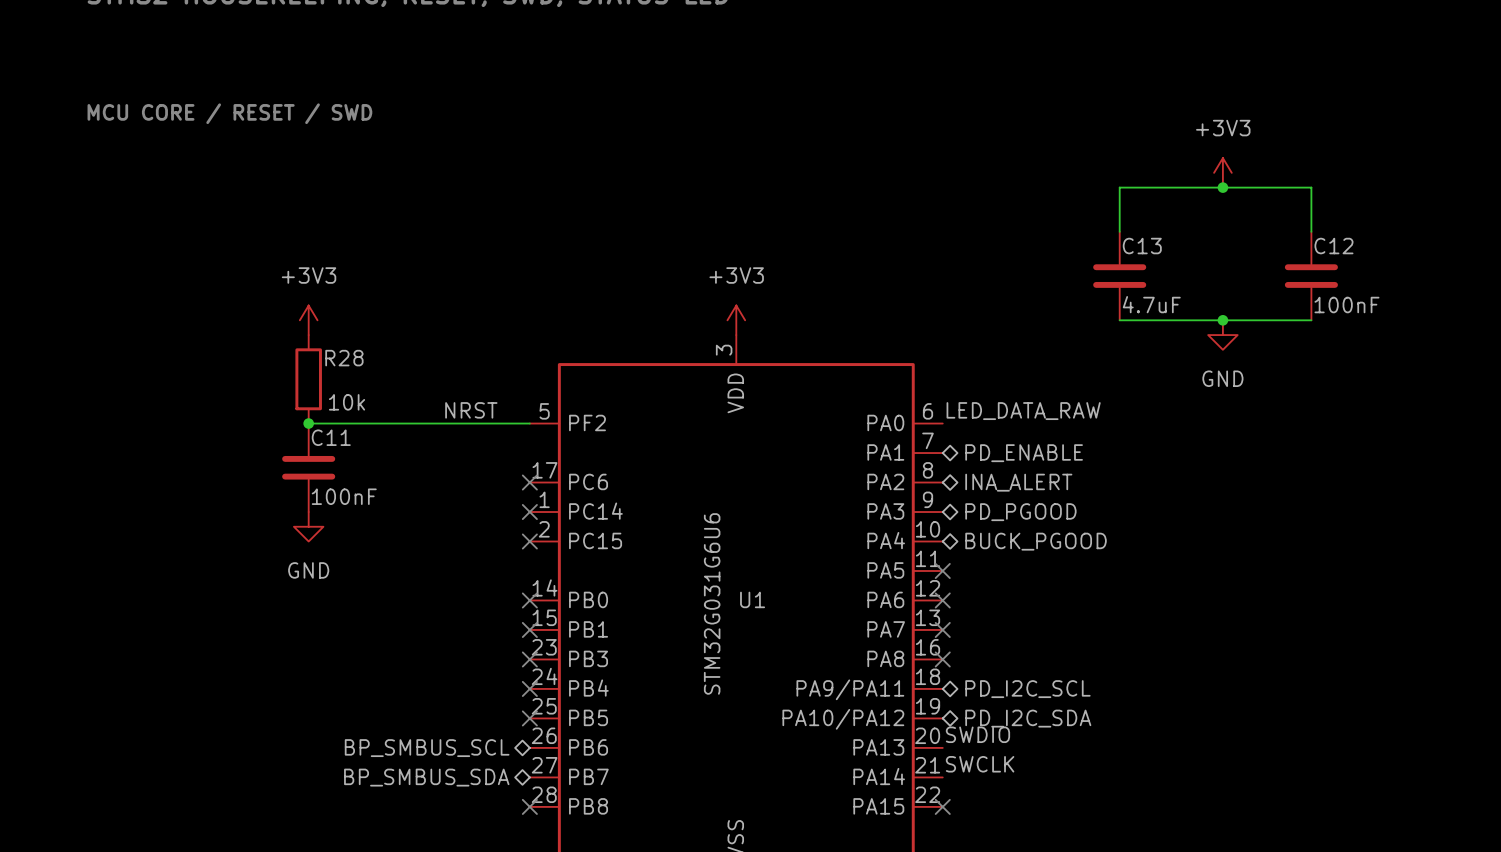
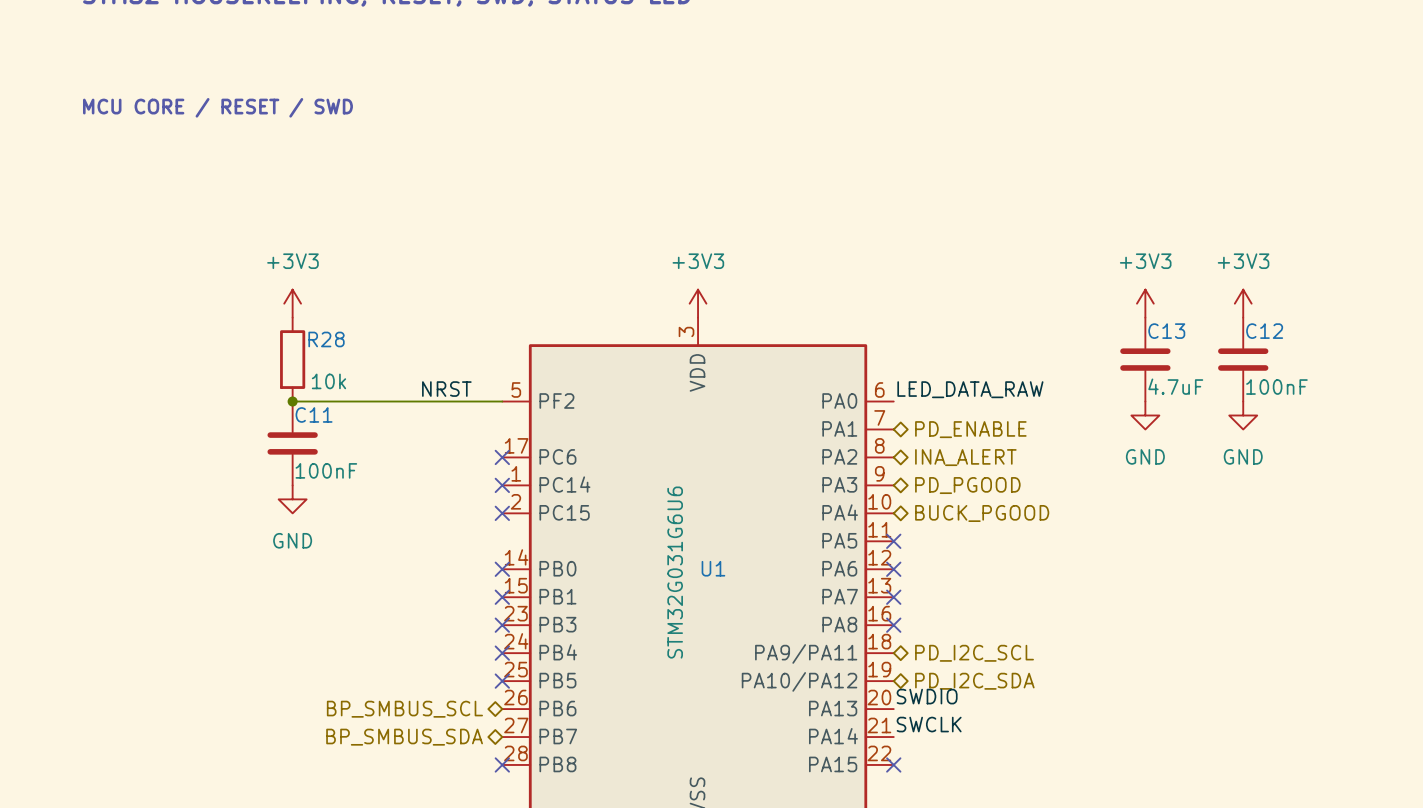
power symbol: +3V3 (1222, 172) -> none
junction: (1222, 187) -> none
wire: (1119, 231) (1119, 187) (1311, 187) (1311, 231) -> none
C13 position: (1119, 276) -> (1145, 359)
C12 position: (1311, 276) -> (1243, 359)
wire: (1119, 320) (1311, 320) -> none
power symbol: none -> +3V3 (1145, 303)
junction: (1222, 320) -> none
power symbol: none -> +3V3 (1243, 303)
power symbol: GND (1222, 335) -> none
power symbol: none -> GND (1145, 415)
power symbol: none -> GND (1243, 415)

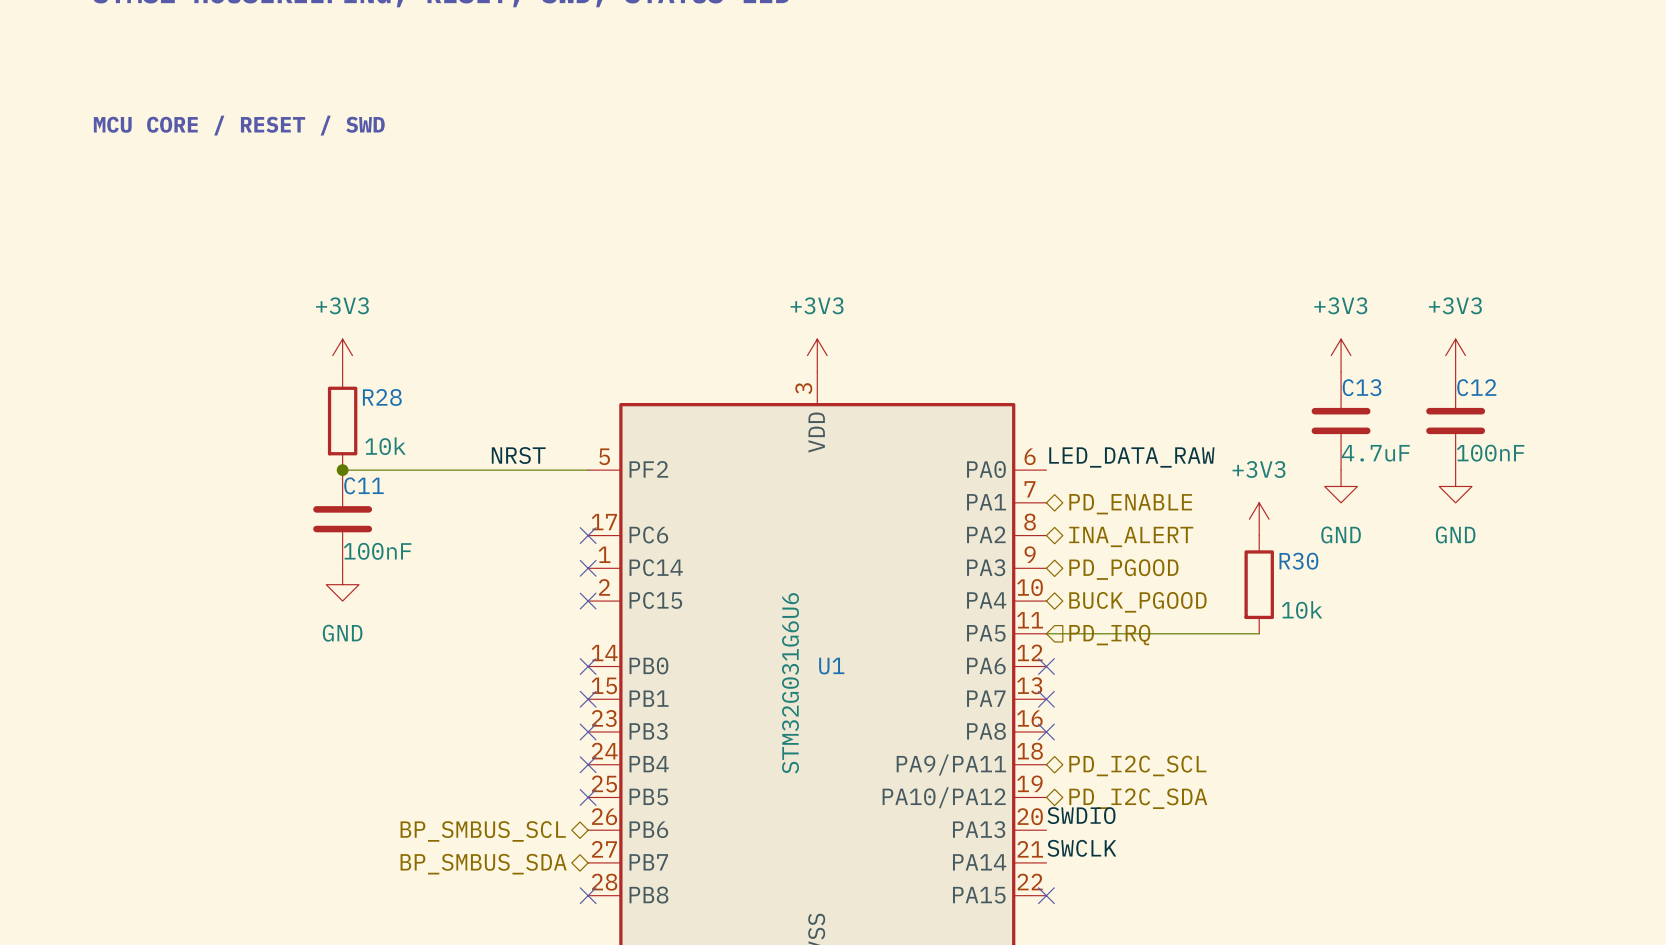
power symbol: none -> +3V3 (1259, 519)
R30: none -> 10k (1259, 584)
wire: none -> (1046, 633) (1259, 633)
no-connect mark: (893, 541) -> none
hierarchical label: none -> PD_IRQ (1109, 635)

